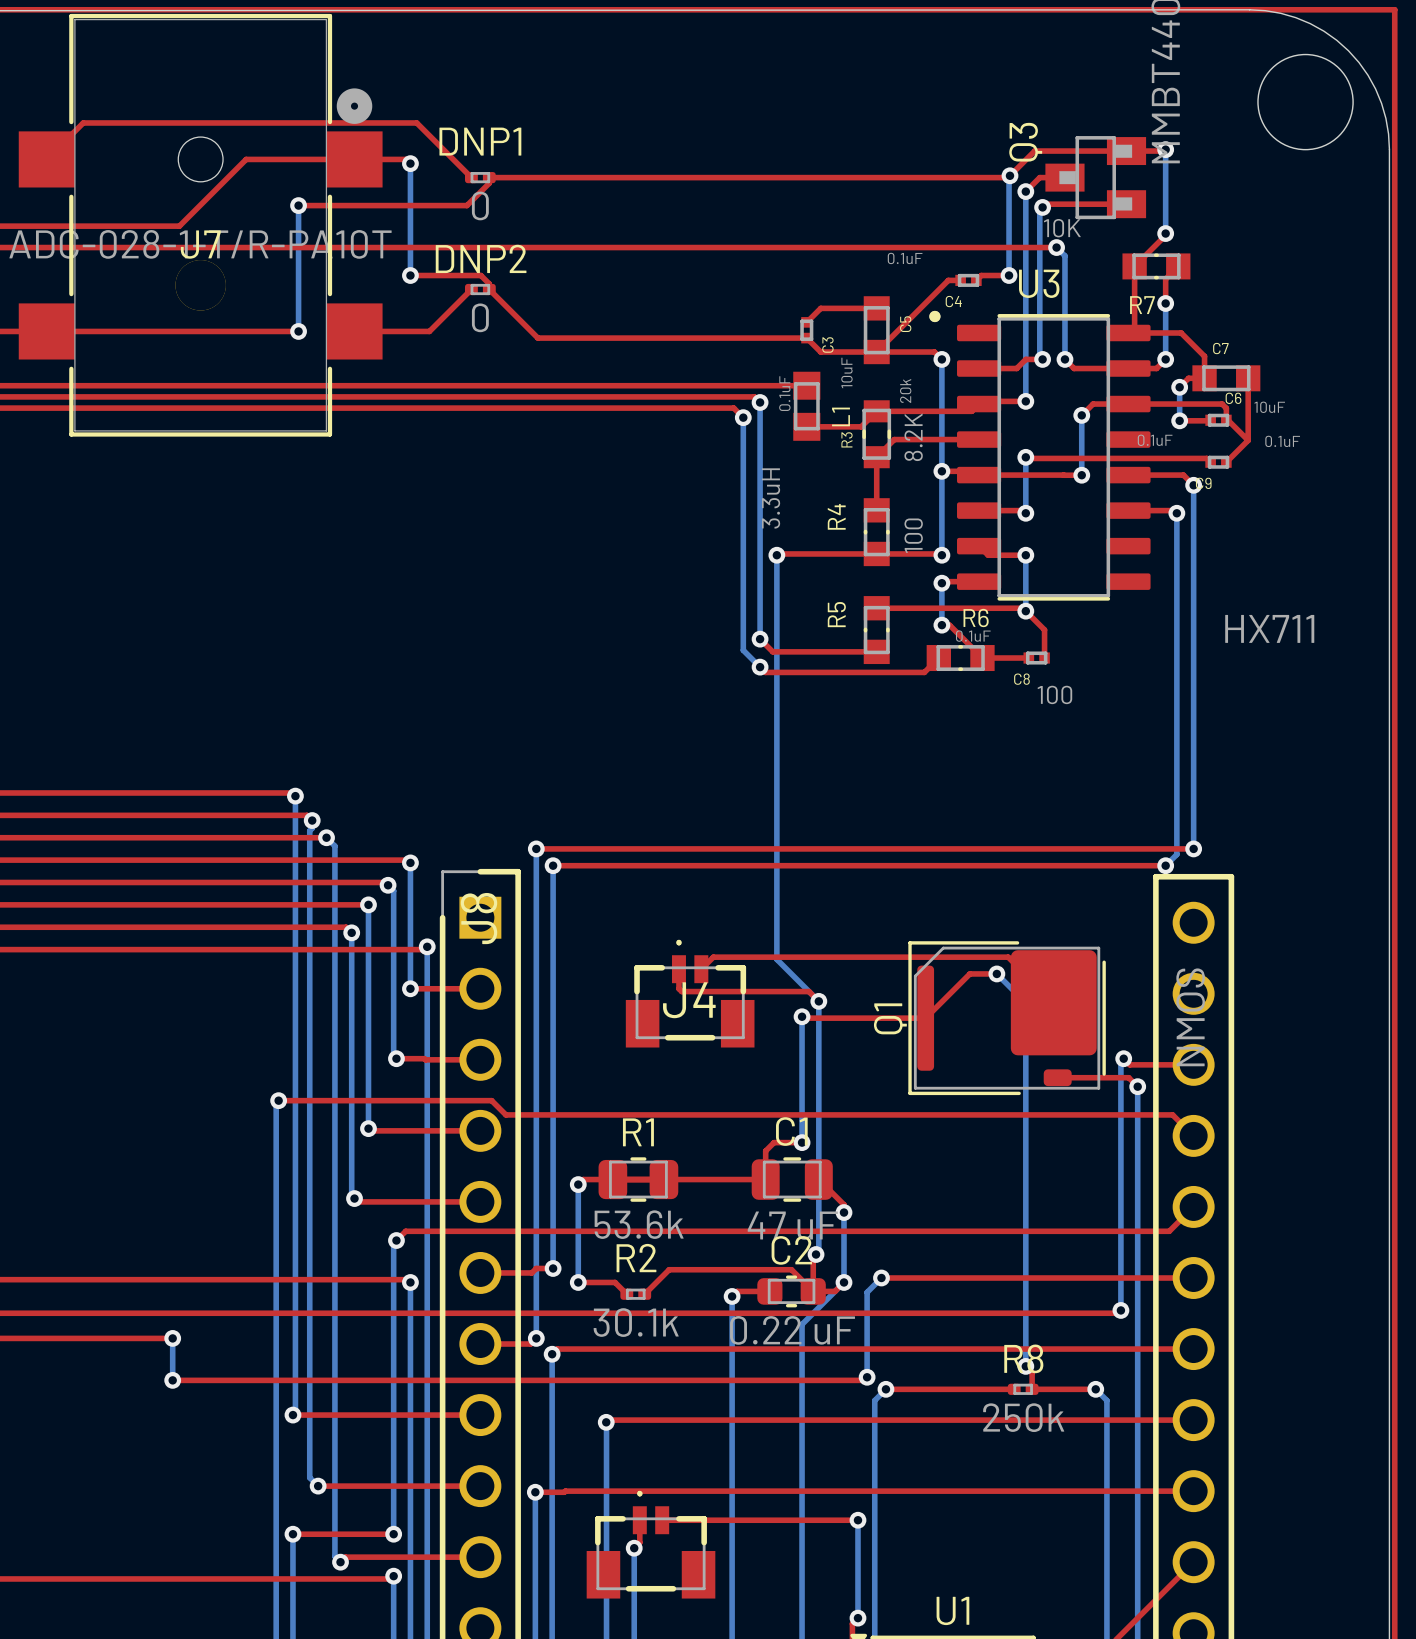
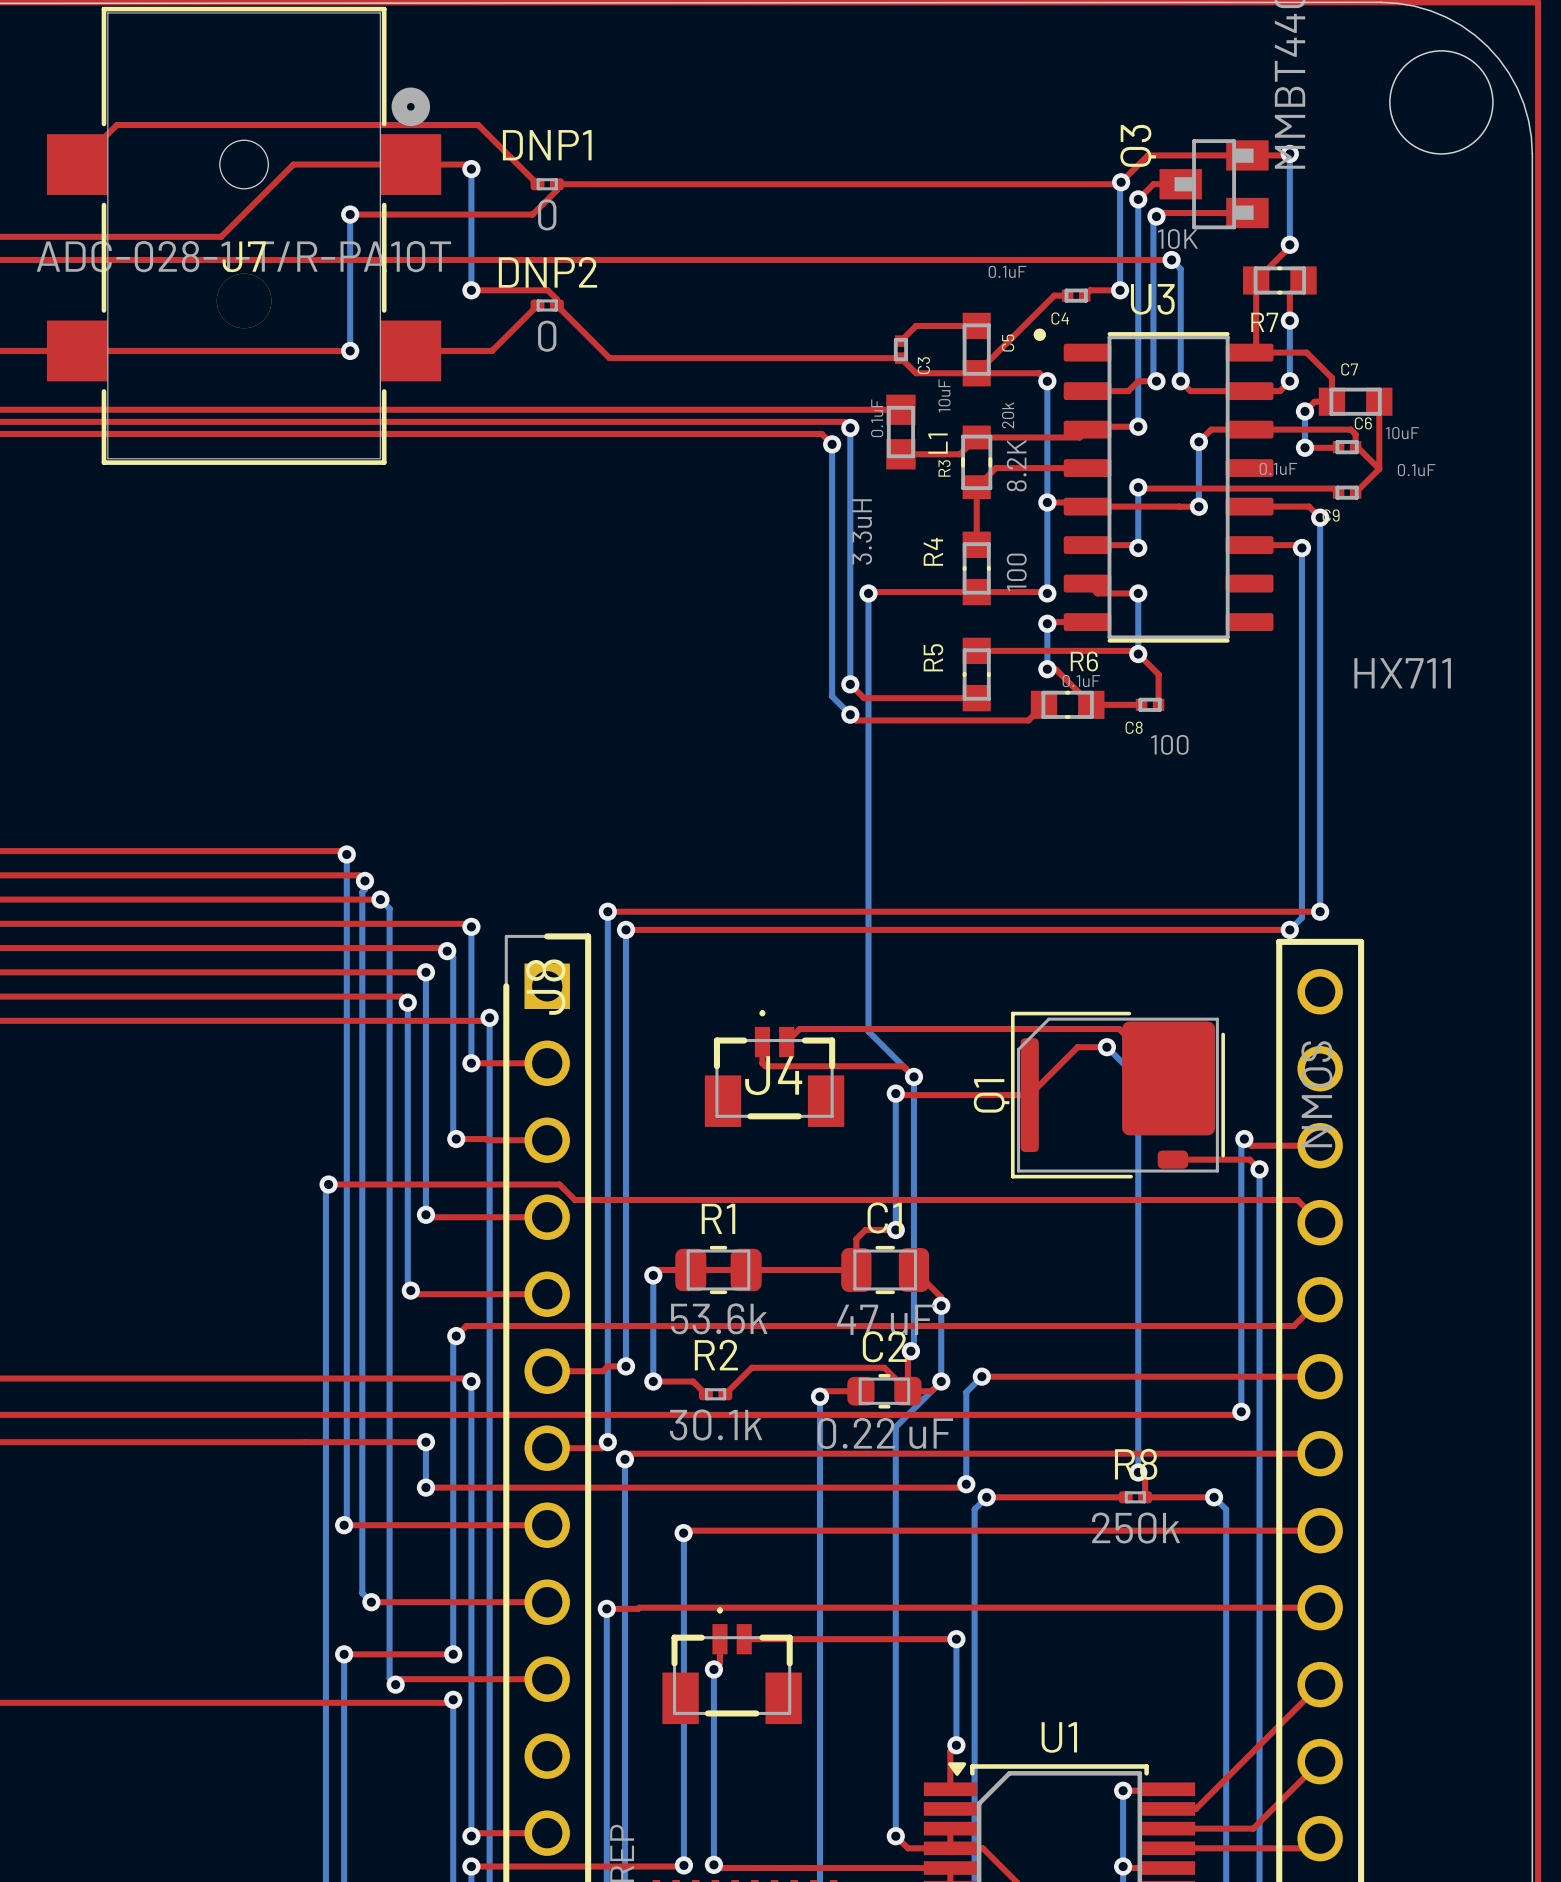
bottom track: (172, 1338) (172, 1380) -> (425, 1442) (425, 1487)
via: (172, 1338) -> none
via: none -> (425, 1442)
top track: (172, 1380) (368, 1380) -> (213, 1442) (425, 1442)
via: (172, 1380) -> none
via: none -> (425, 1487)

